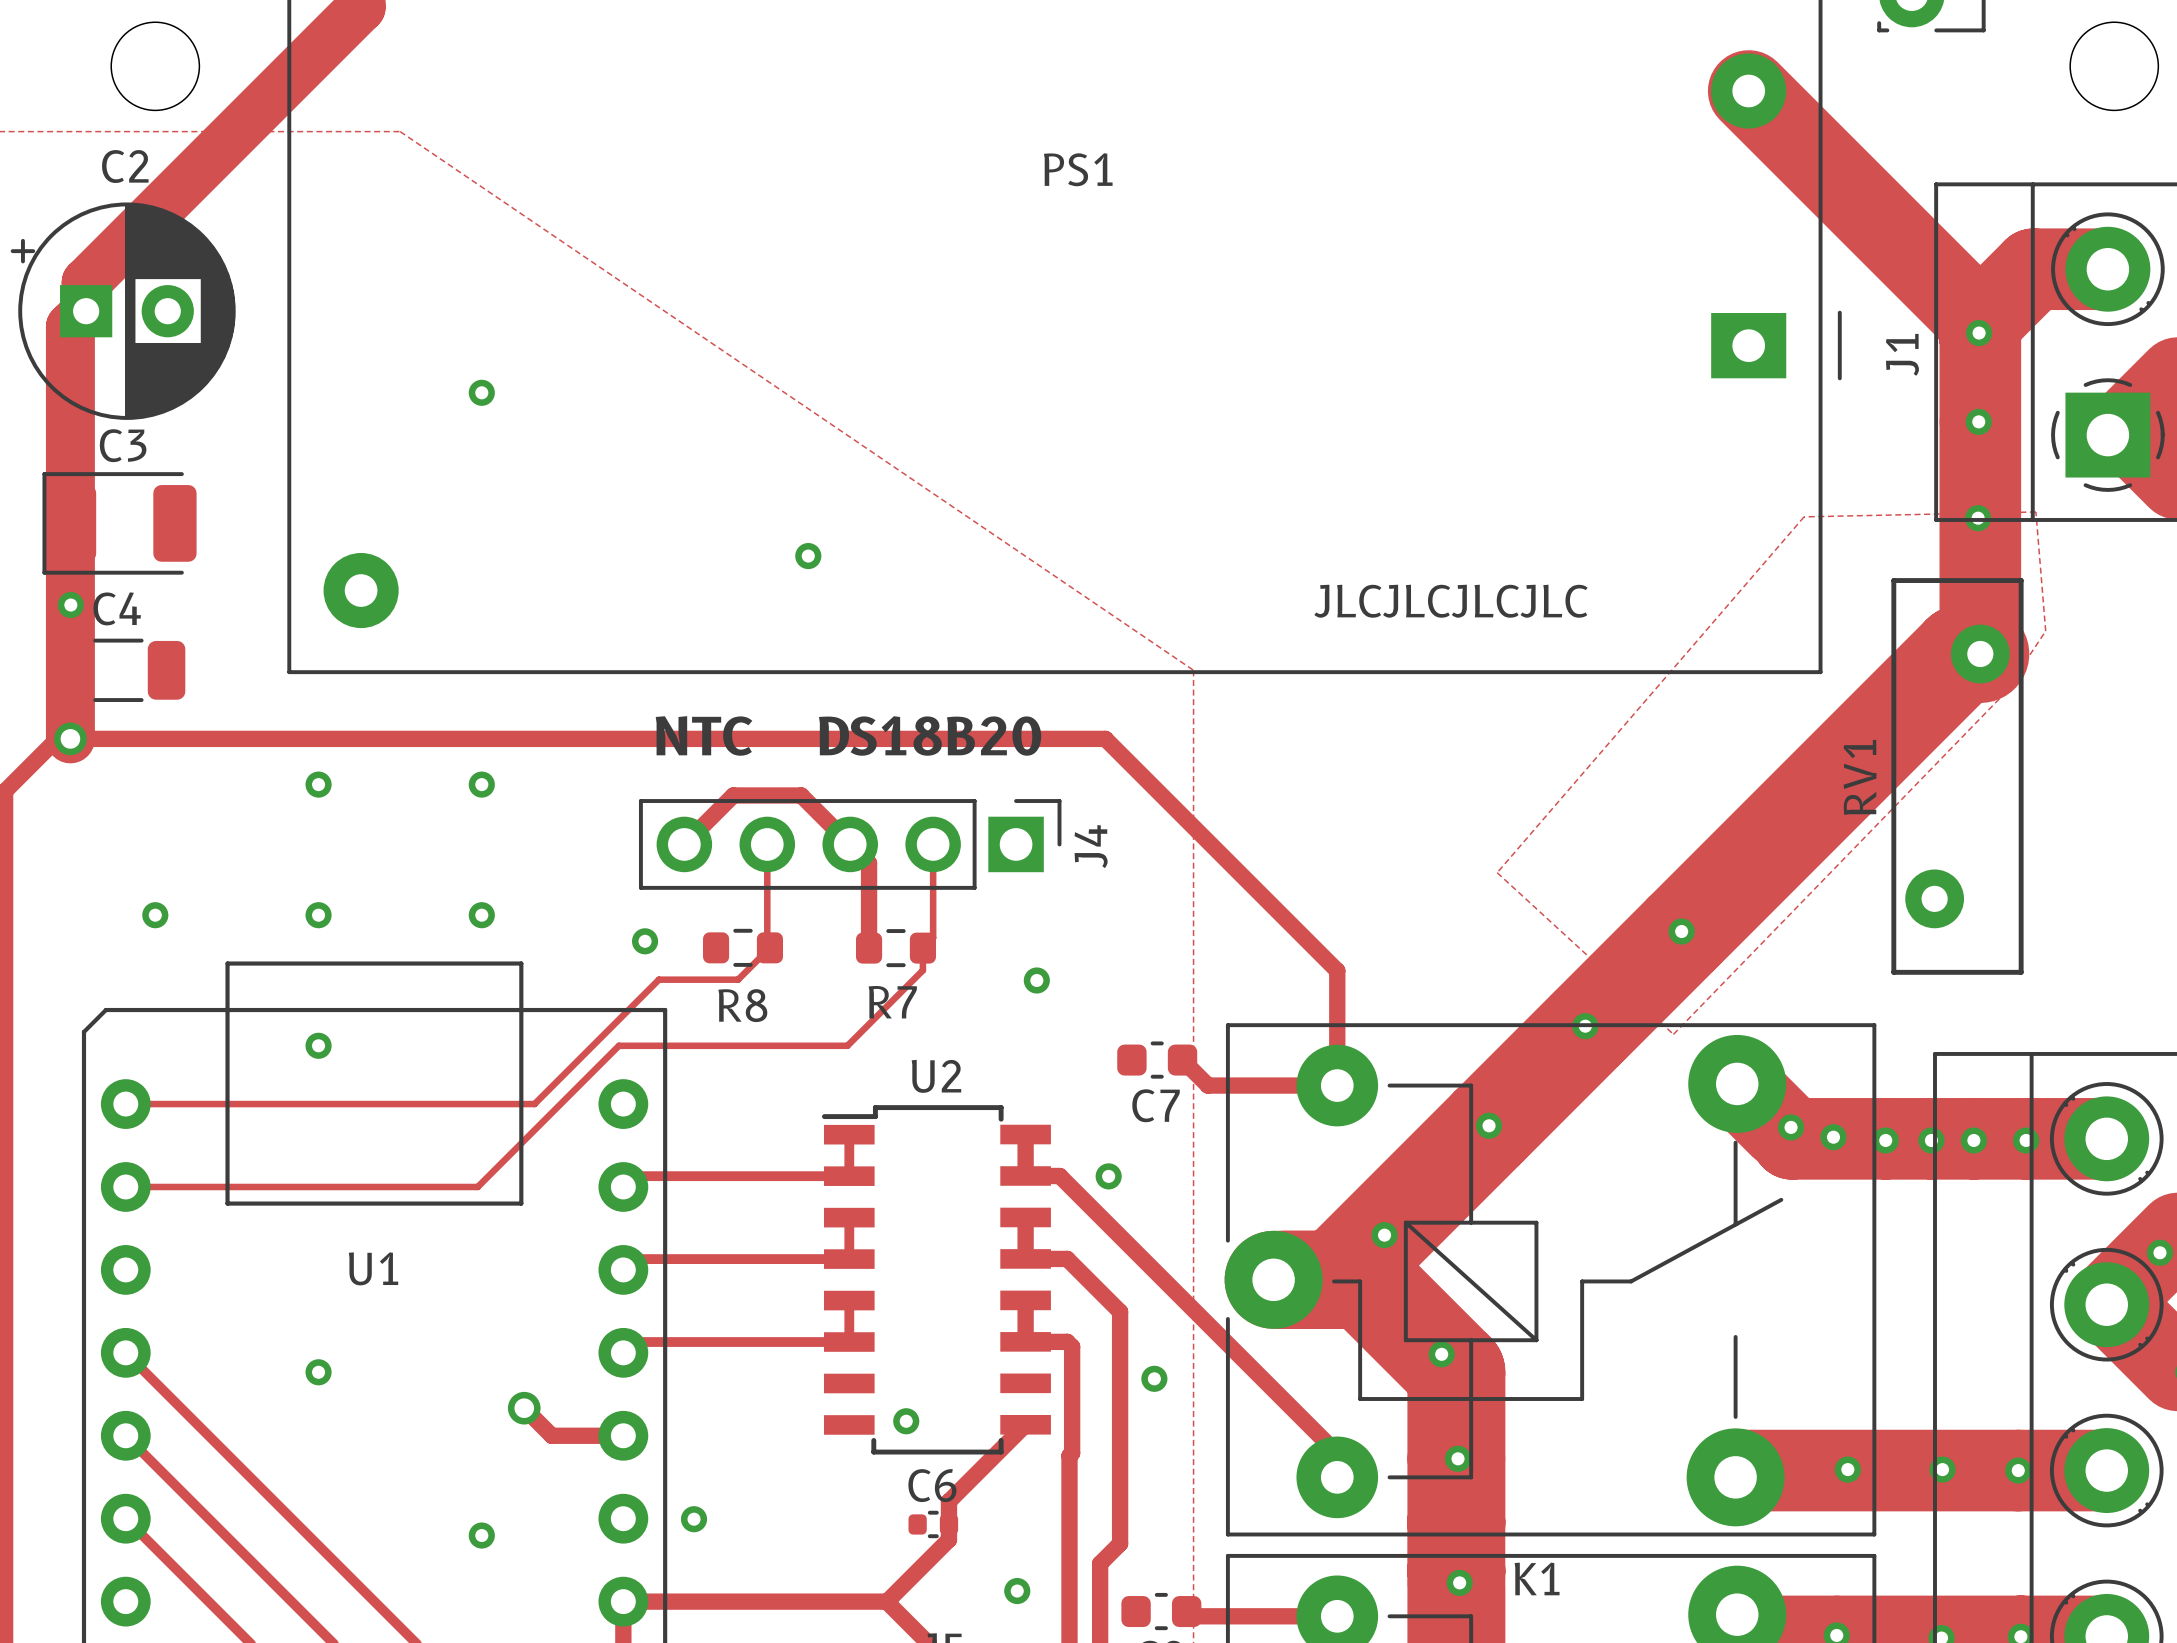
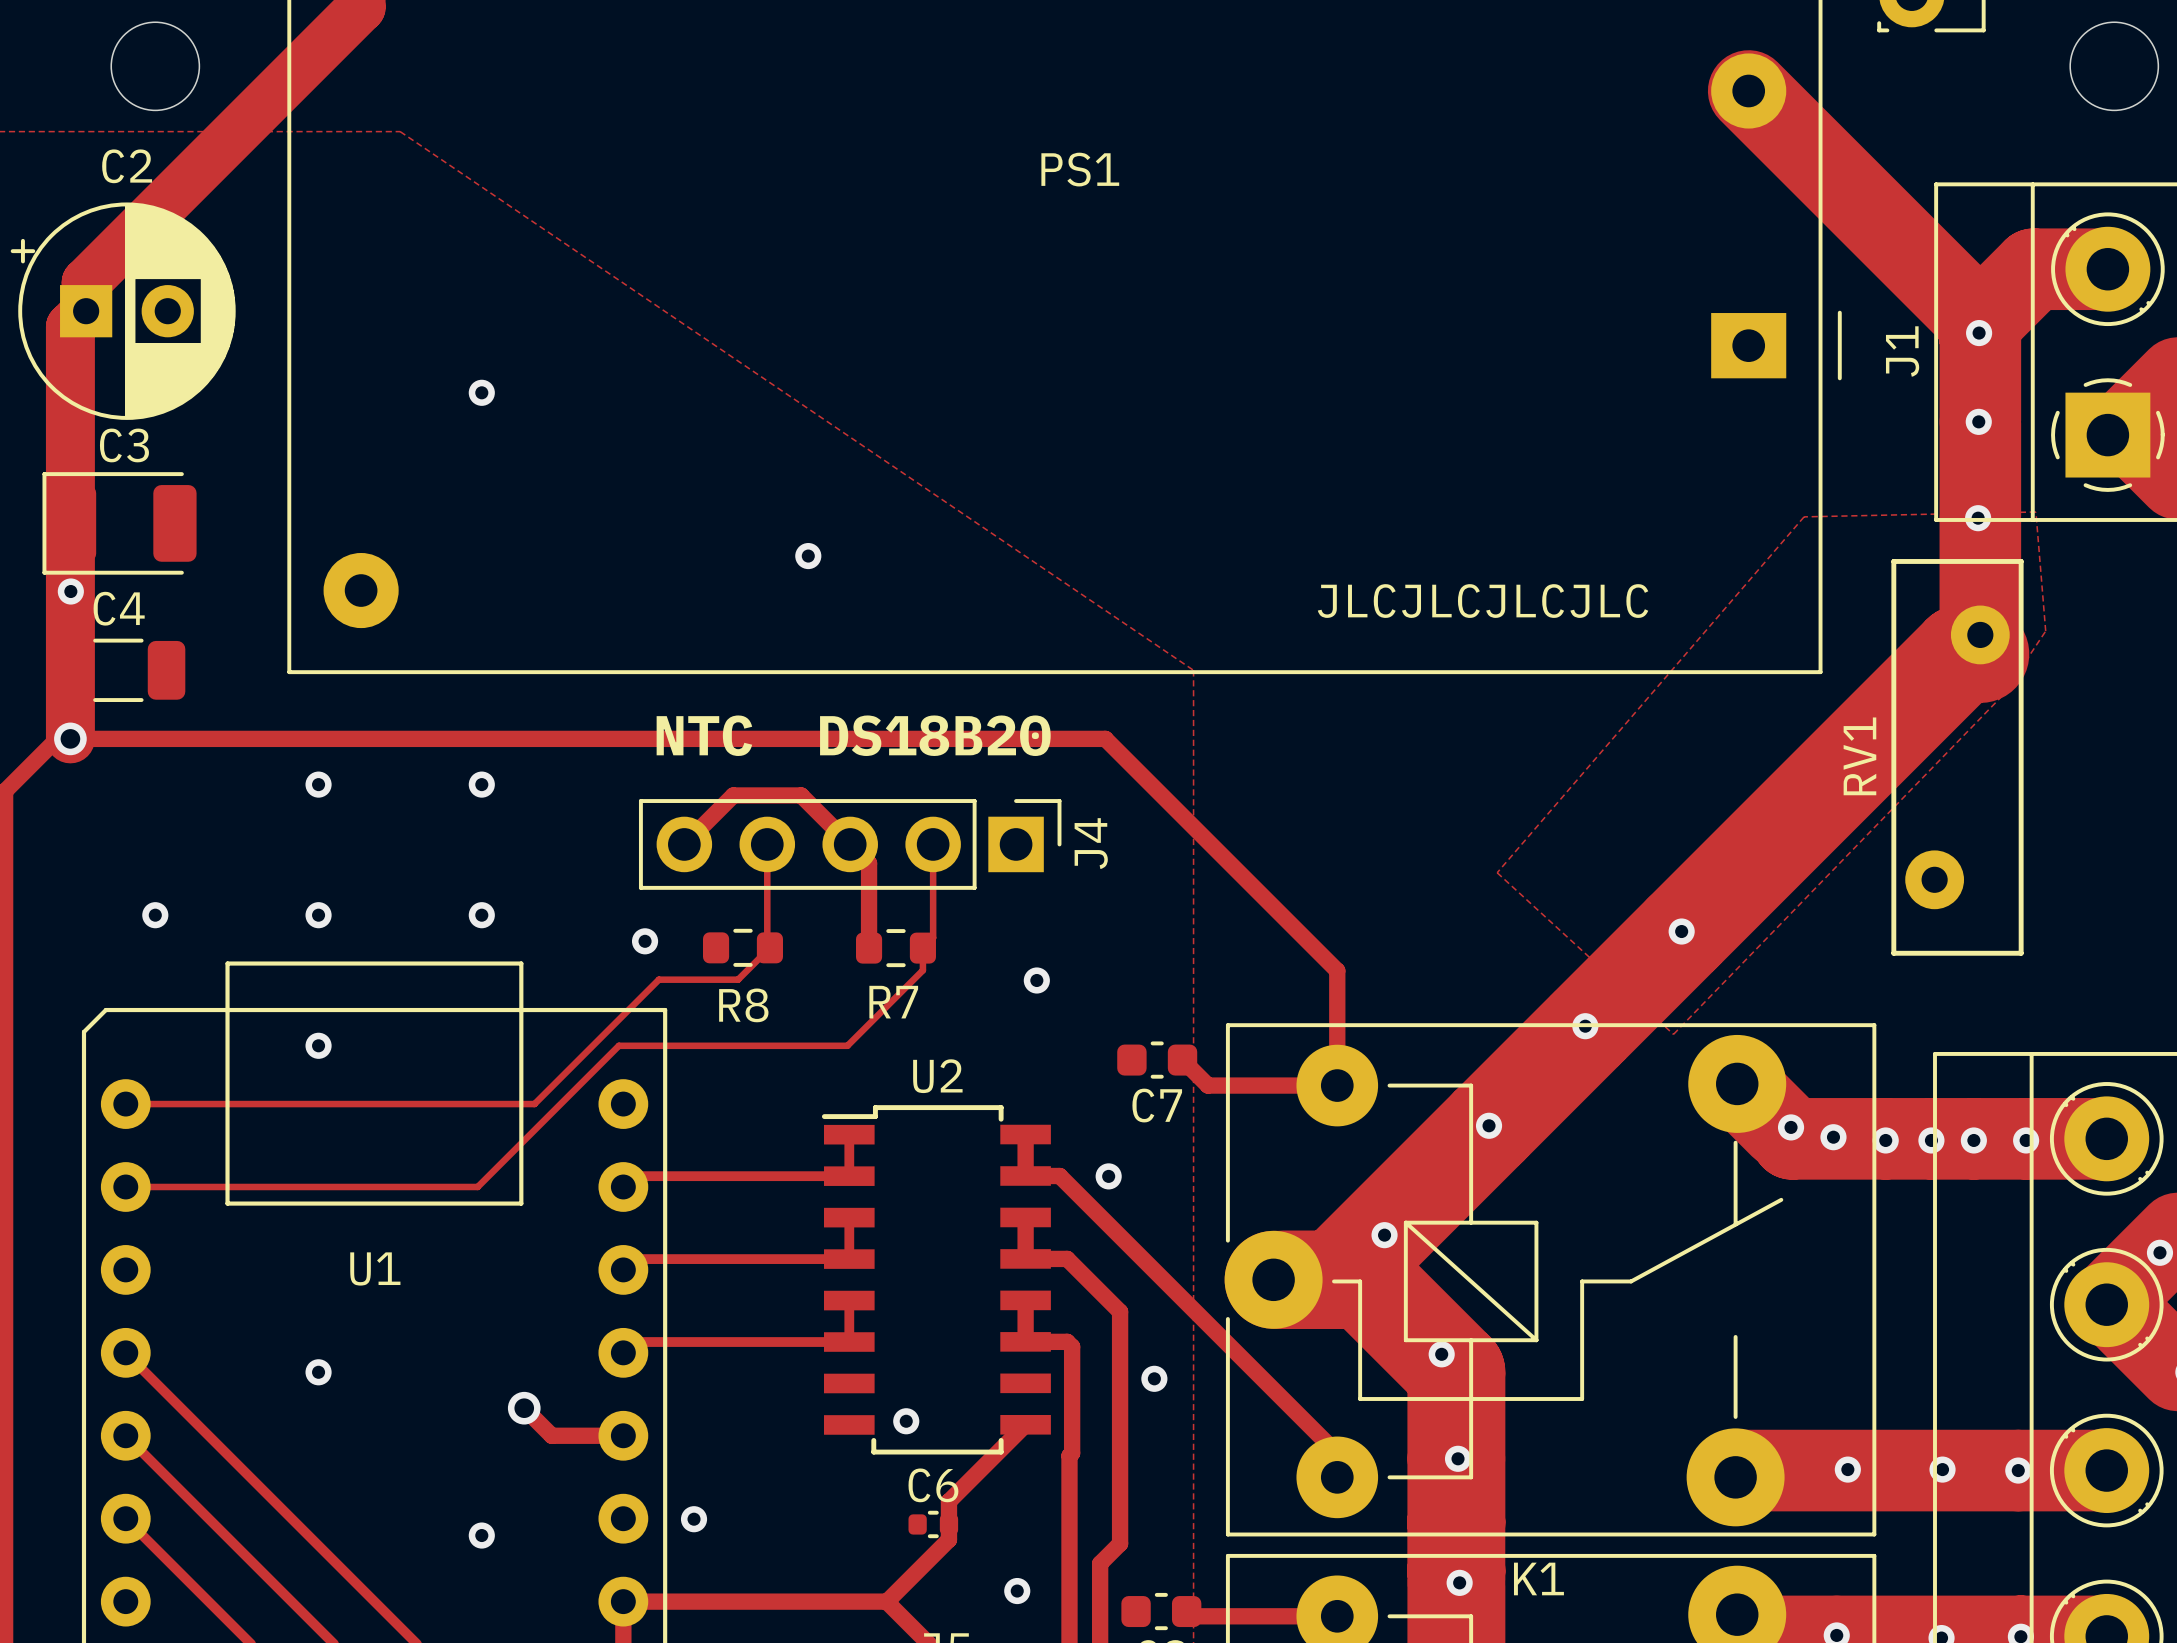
via position: (70, 605) -> (70, 591)
RV1 position: (1957, 776) -> (1957, 757)

